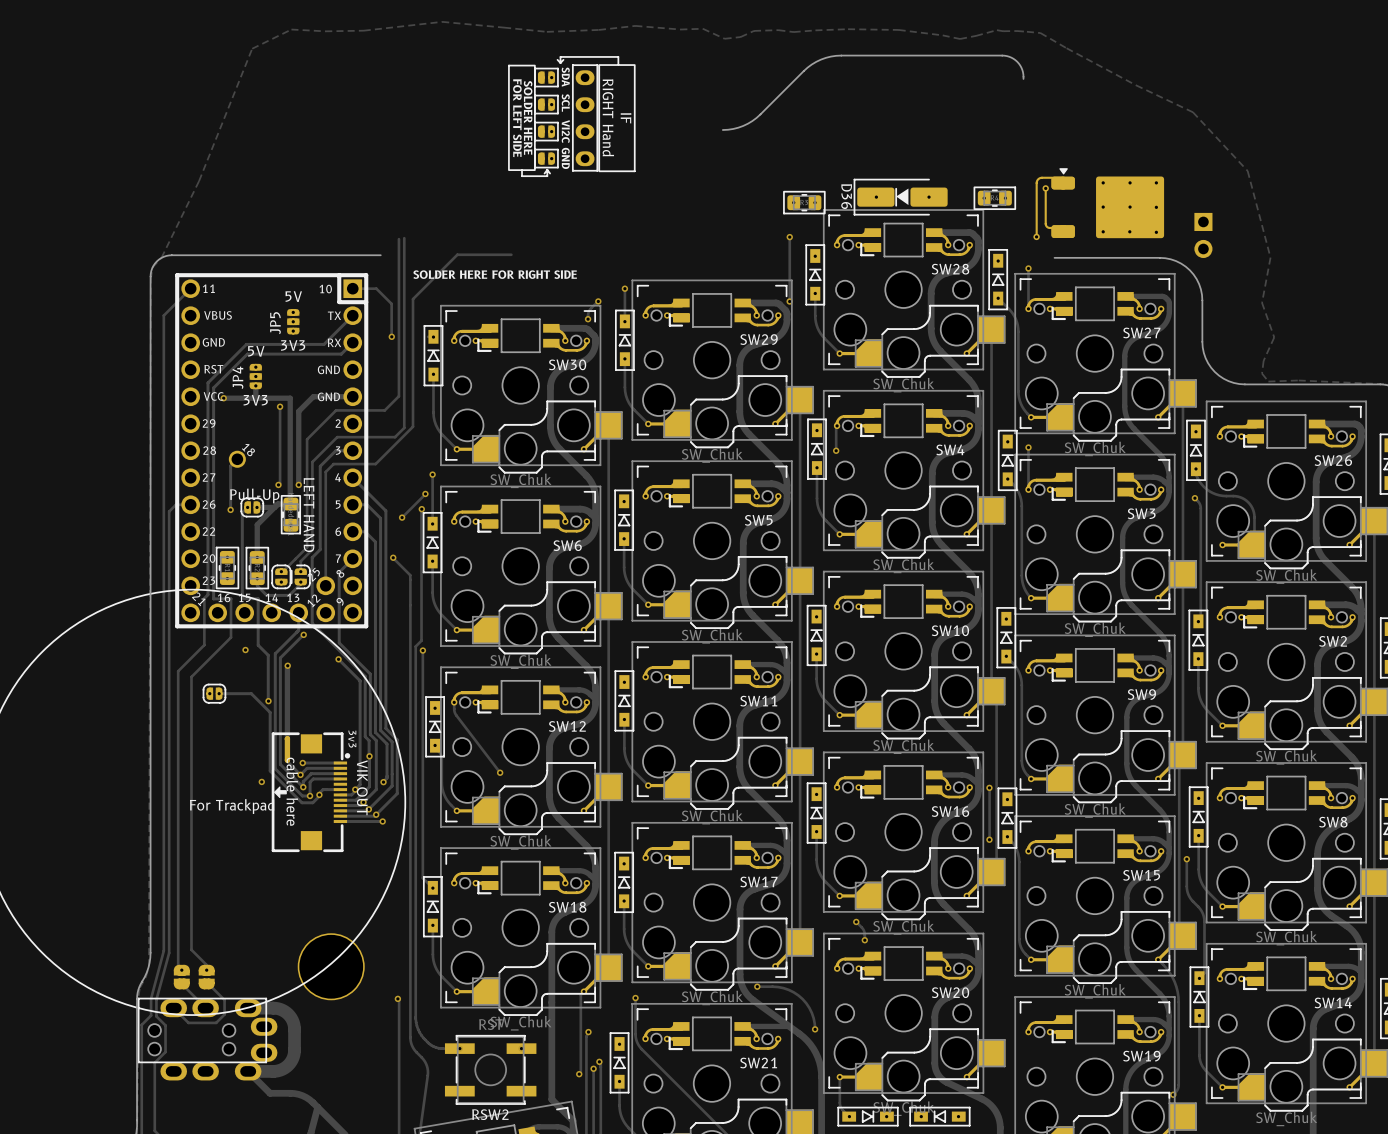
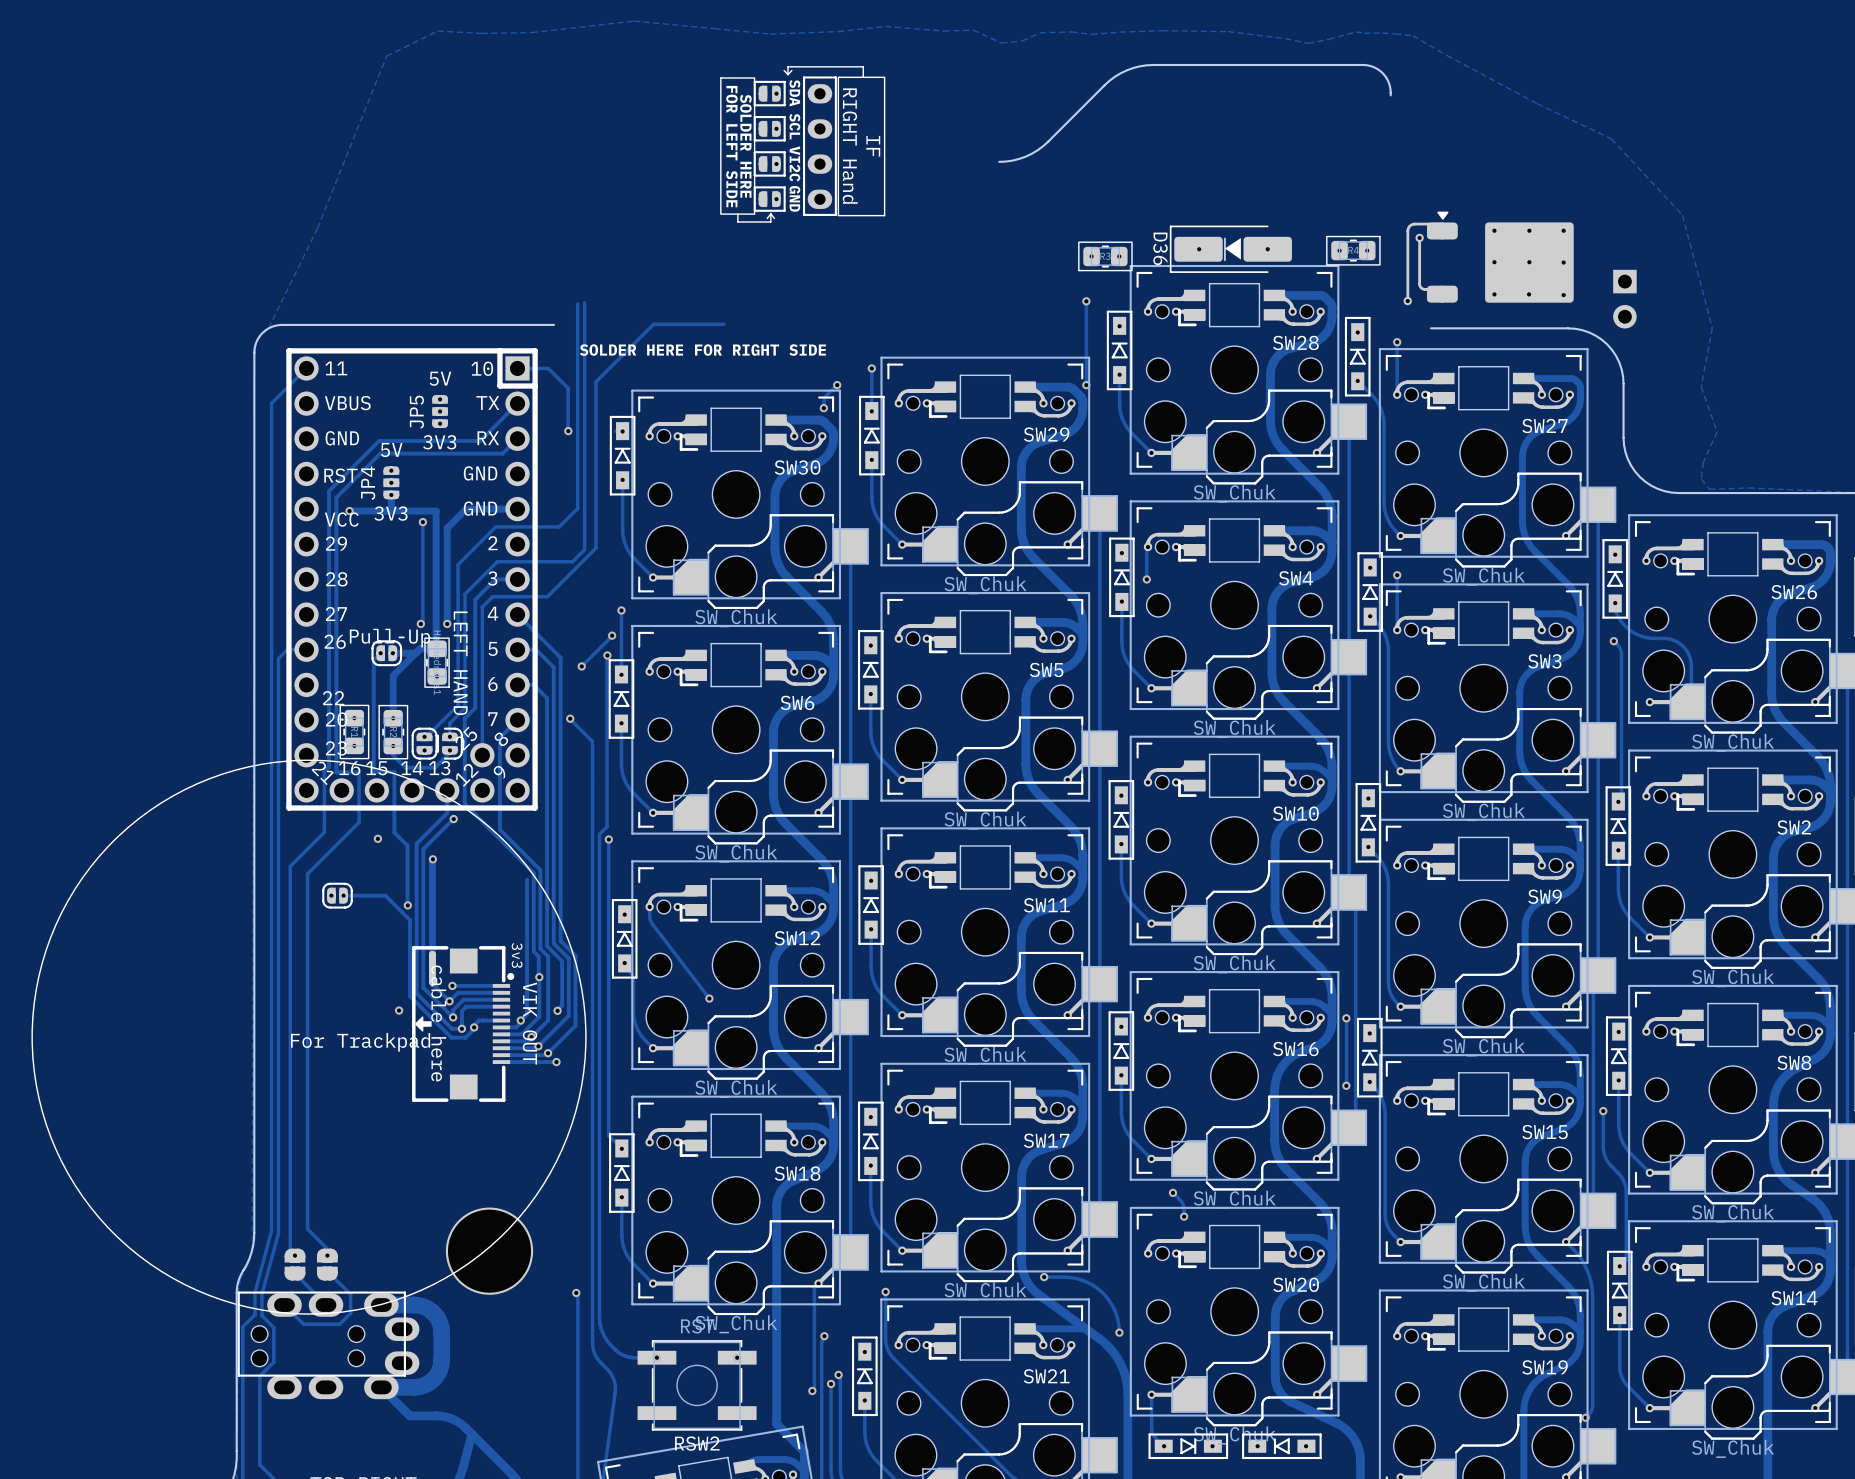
part footprint: [175, 273, 369, 629] -> [286, 348, 538, 811]
track: (237, 459) (230, 466) (230, 509) -> none
via: (230, 509) -> none
track: (338, 659) (360, 681) -> none
via: (338, 659) -> none

